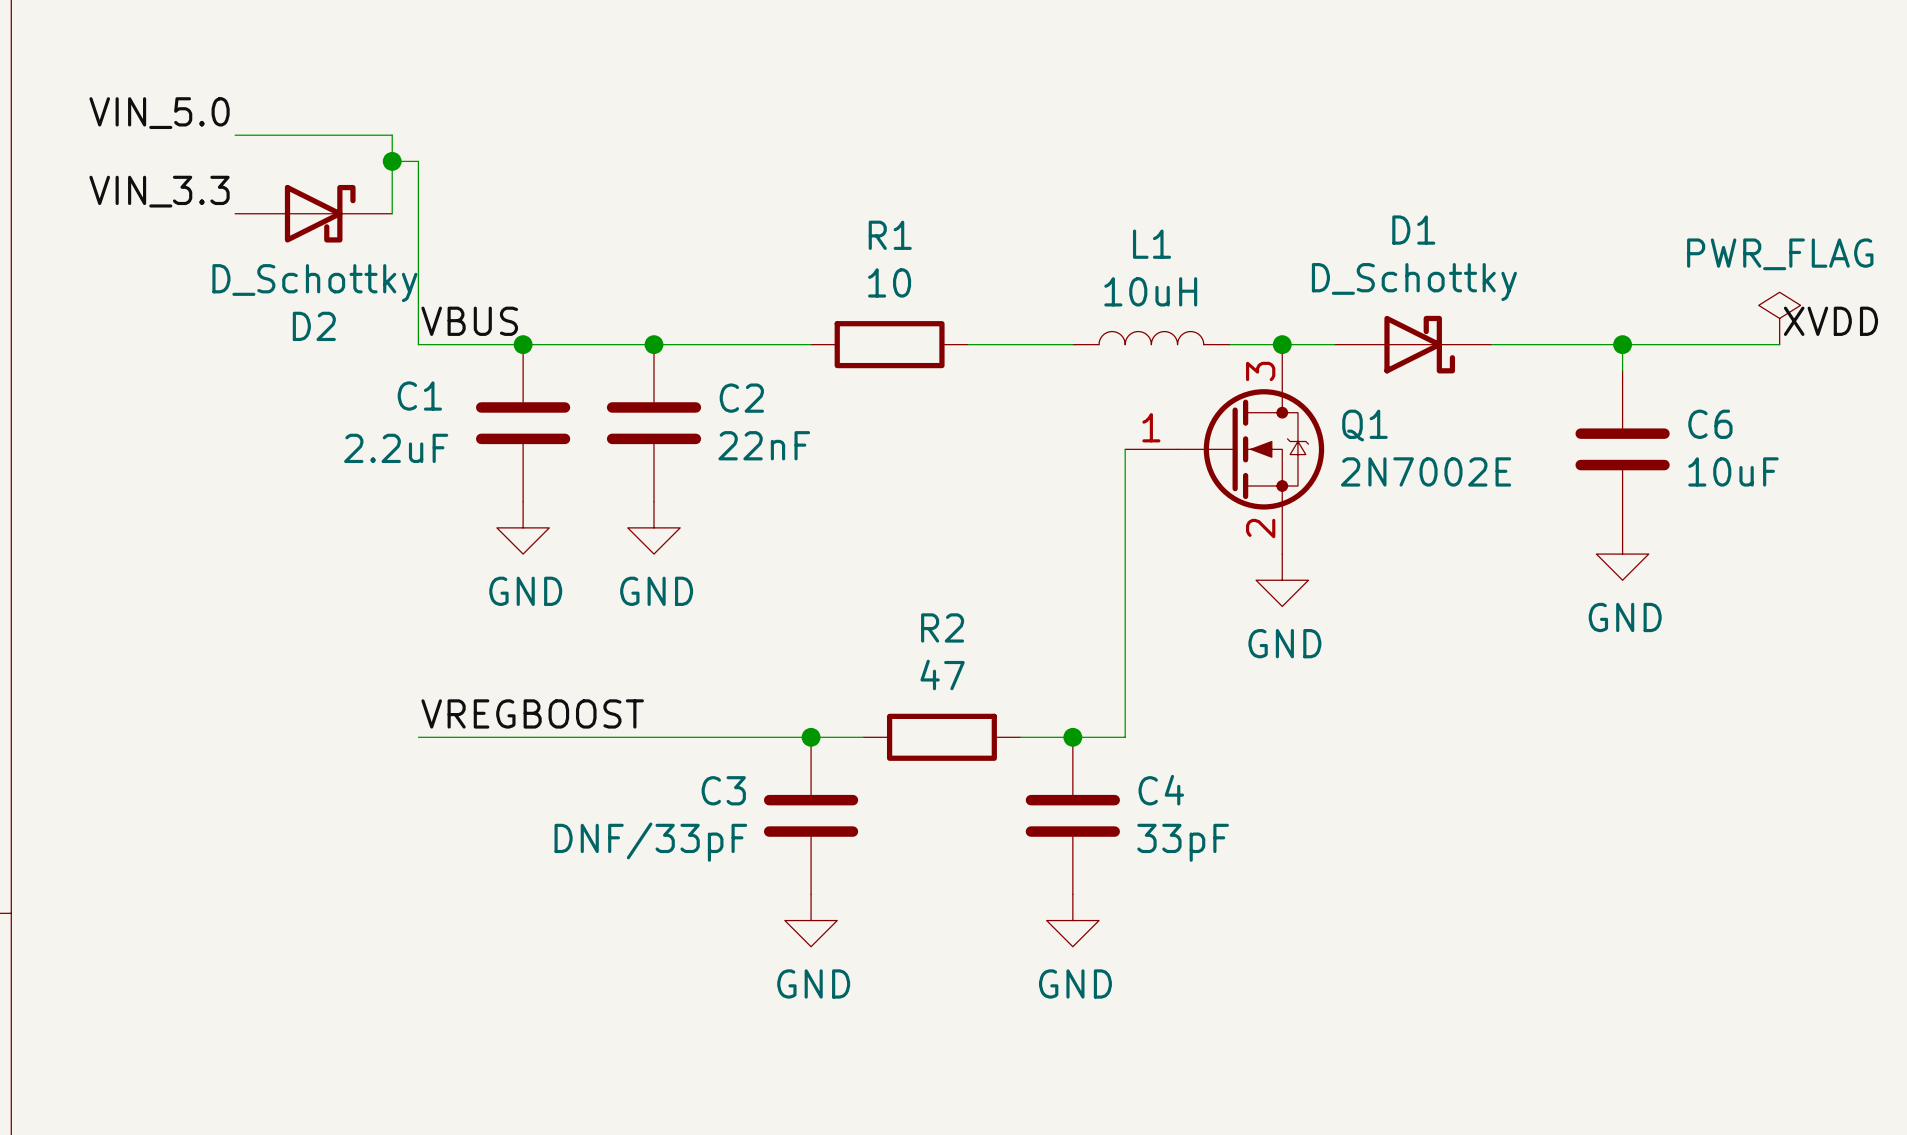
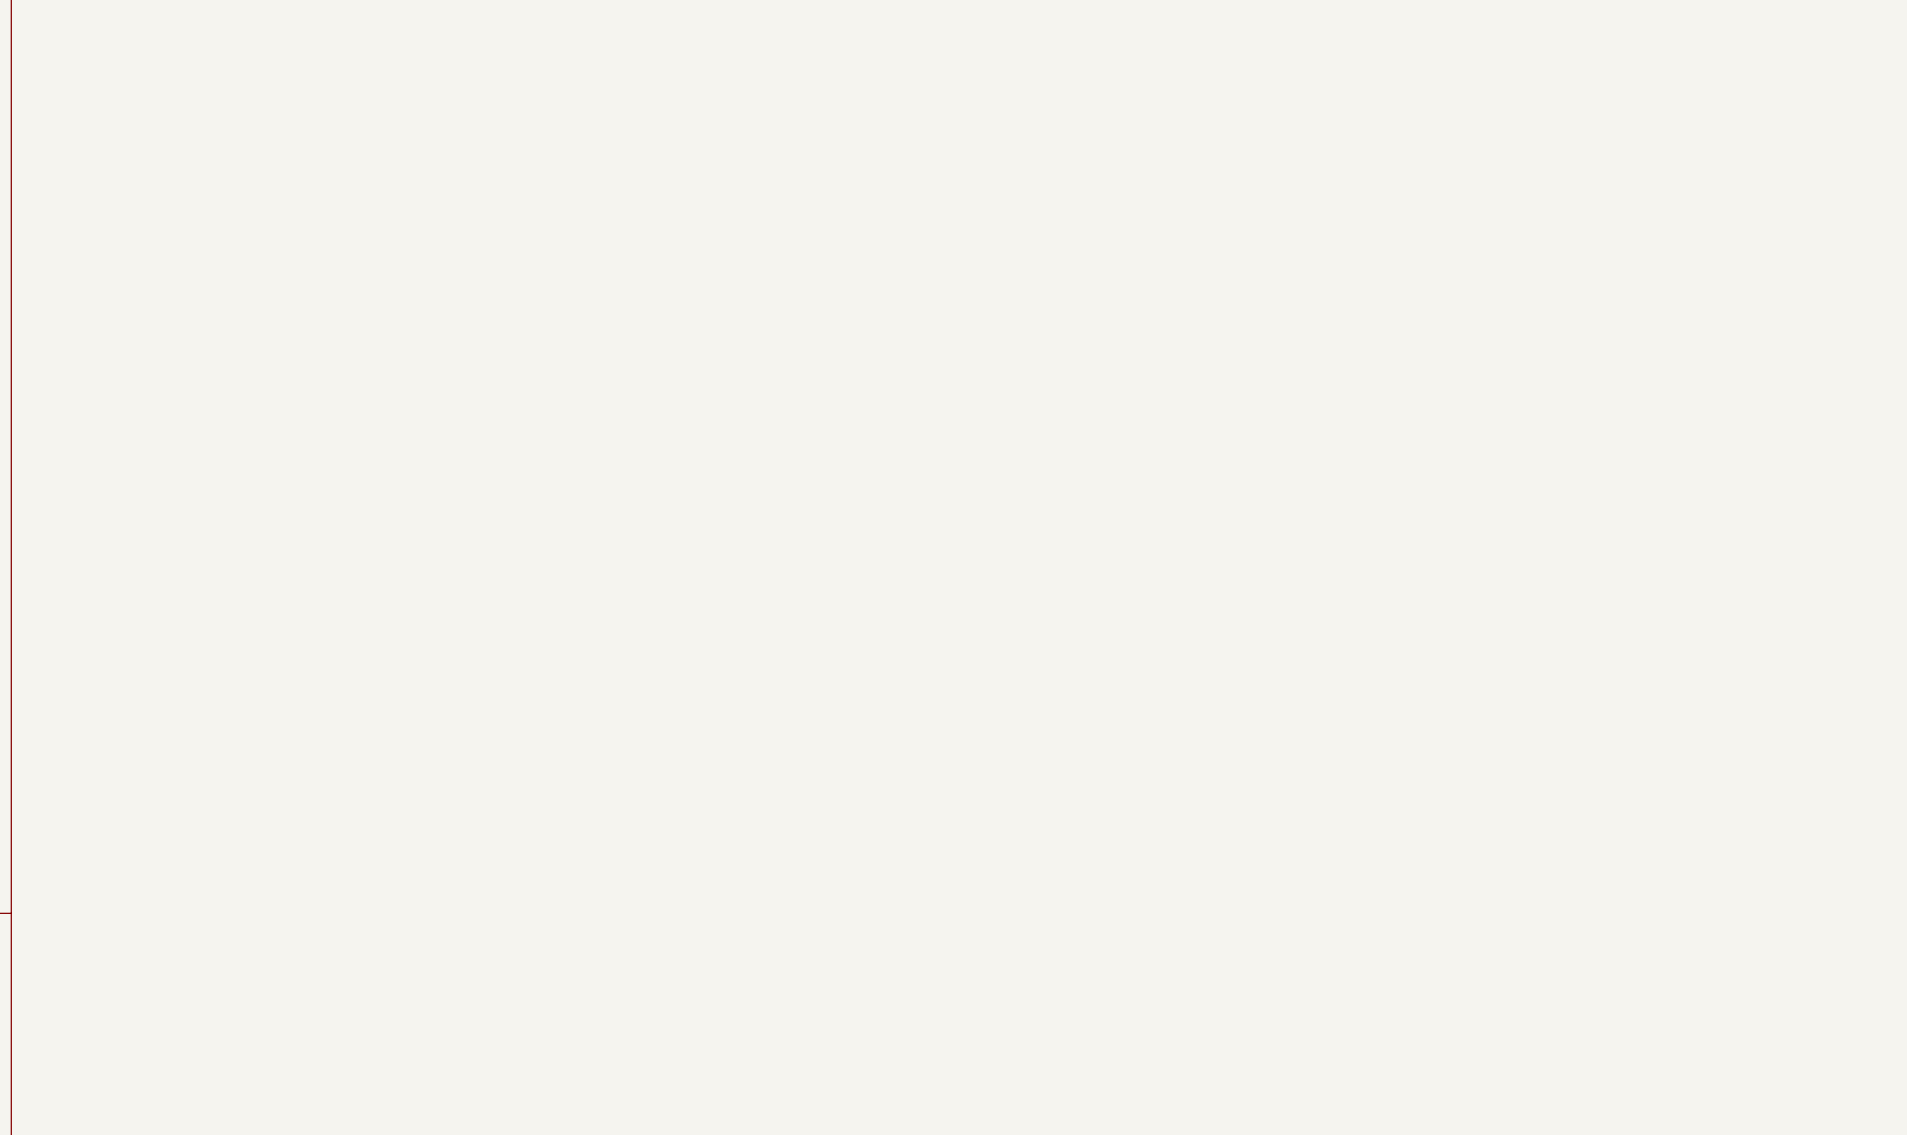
label: VIN_5.0 (159, 113) -> none
wire: (235, 135) (392, 135) (392, 213) -> none
wire: (392, 161) (418, 161) (418, 344) (811, 344) -> none
junction: (392, 161) -> none
label: VIN_3.3 (159, 191) -> none
D2: D_Schottky (313, 213) -> none
power symbol: PWR_FLAG (1779, 318) -> none
label: VBUS (469, 321) -> none
label: XVDD (1830, 321) -> none
L1: 10uH (1151, 338) -> none
junction: (523, 344) -> none
junction: (654, 344) -> none
R1: 10 (889, 344) -> none
wire: (968, 344) (1072, 344) -> none
wire: (1229, 344) (1334, 344) -> none
junction: (1282, 344) -> none
D1: D_Schottky (1413, 344) -> none
wire: (1491, 344) (1779, 344) -> none
wire: (1622, 344) (1622, 370) -> none
junction: (1622, 344) -> none
C1: 2.2uF (523, 423) -> none
C2: 22nF (654, 423) -> none
wire: (1125, 449) (1125, 737) (1020, 737) -> none
Q1: 2N7002E (1224, 449) -> none
C6: 10uF (1622, 449) -> none
power symbol: GND (523, 527) -> none
power symbol: GND (654, 527) -> none
power symbol: GND (1622, 554) -> none
power symbol: GND (1282, 580) -> none
label: VREGBOOST (532, 713) -> none
wire: (418, 737) (863, 737) -> none
junction: (811, 737) -> none
R2: 47 (941, 737) -> none
junction: (1072, 737) -> none
C3: DNF/33pF (811, 815) -> none
C4: 33pF (1072, 815) -> none
power symbol: GND (811, 920) -> none
power symbol: GND (1072, 920) -> none

